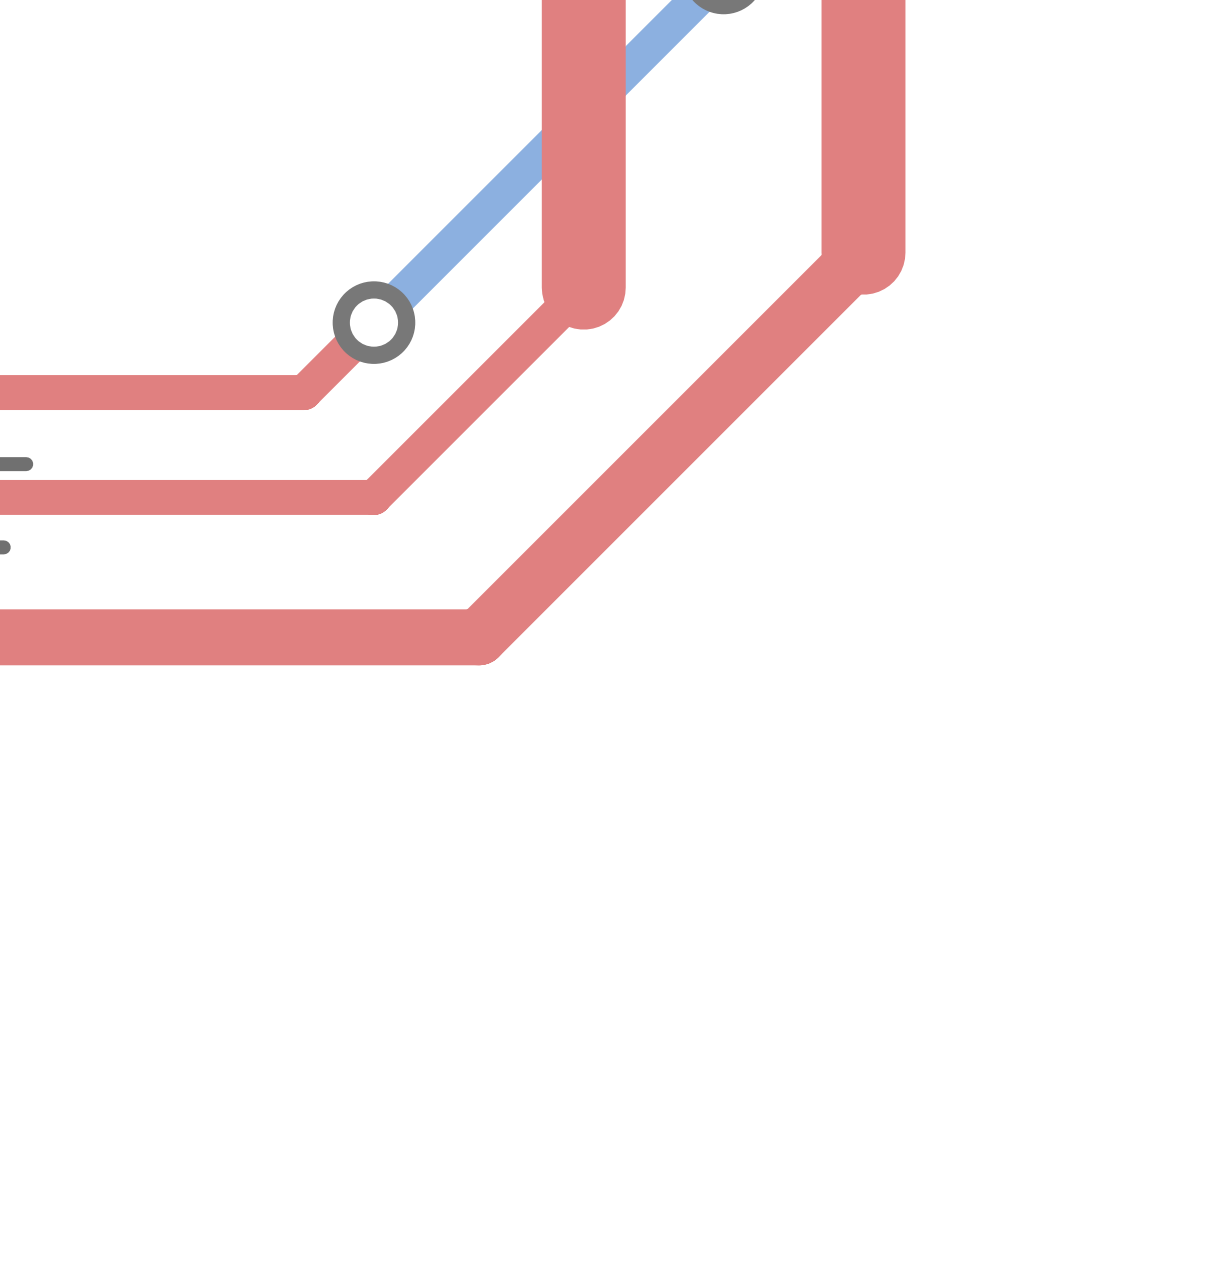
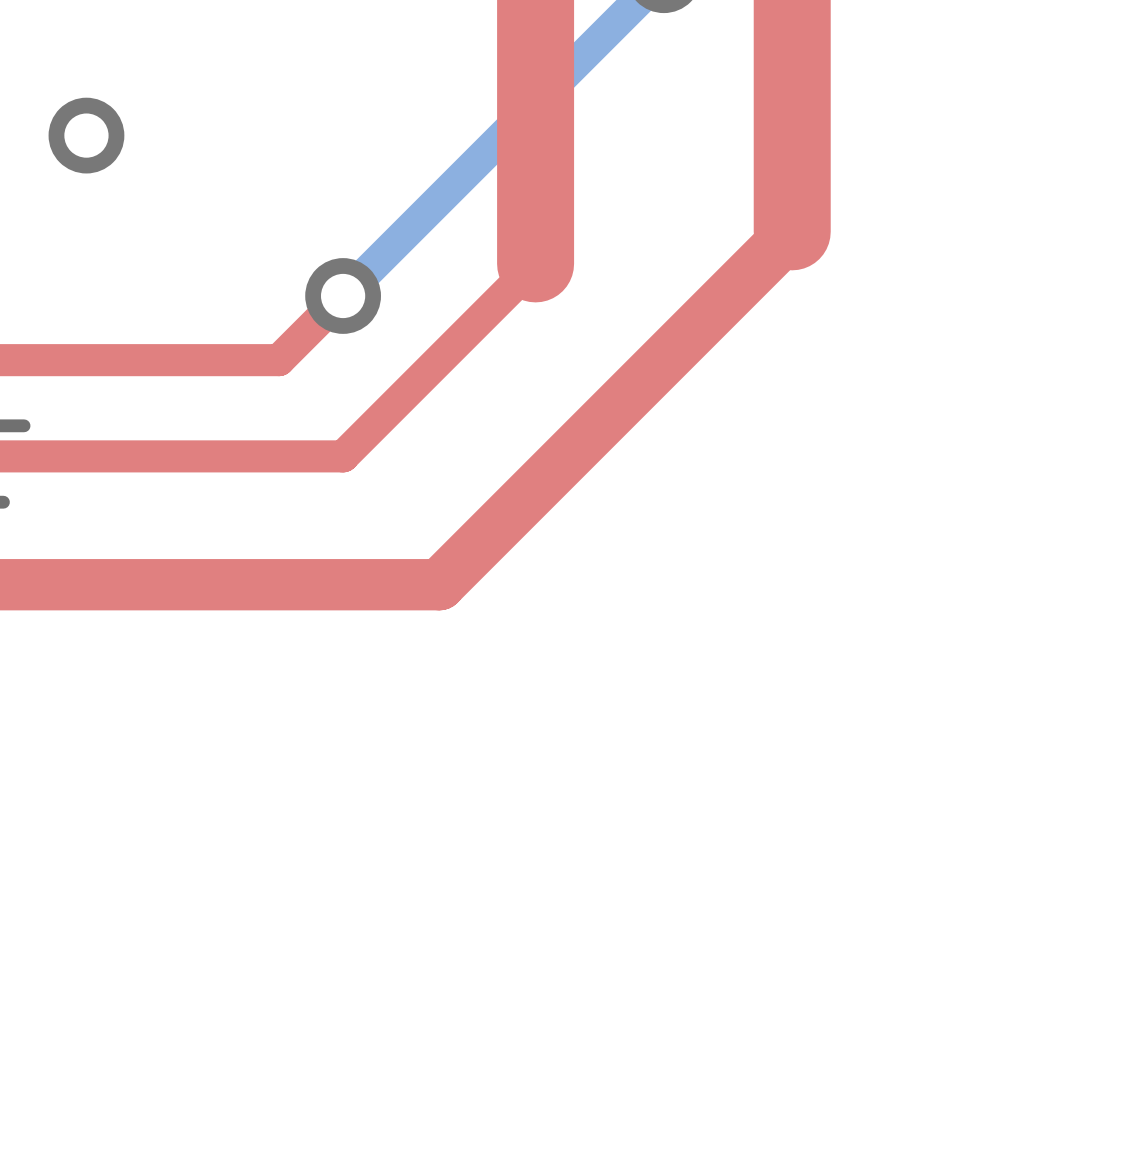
via: none -> (86, 135)

